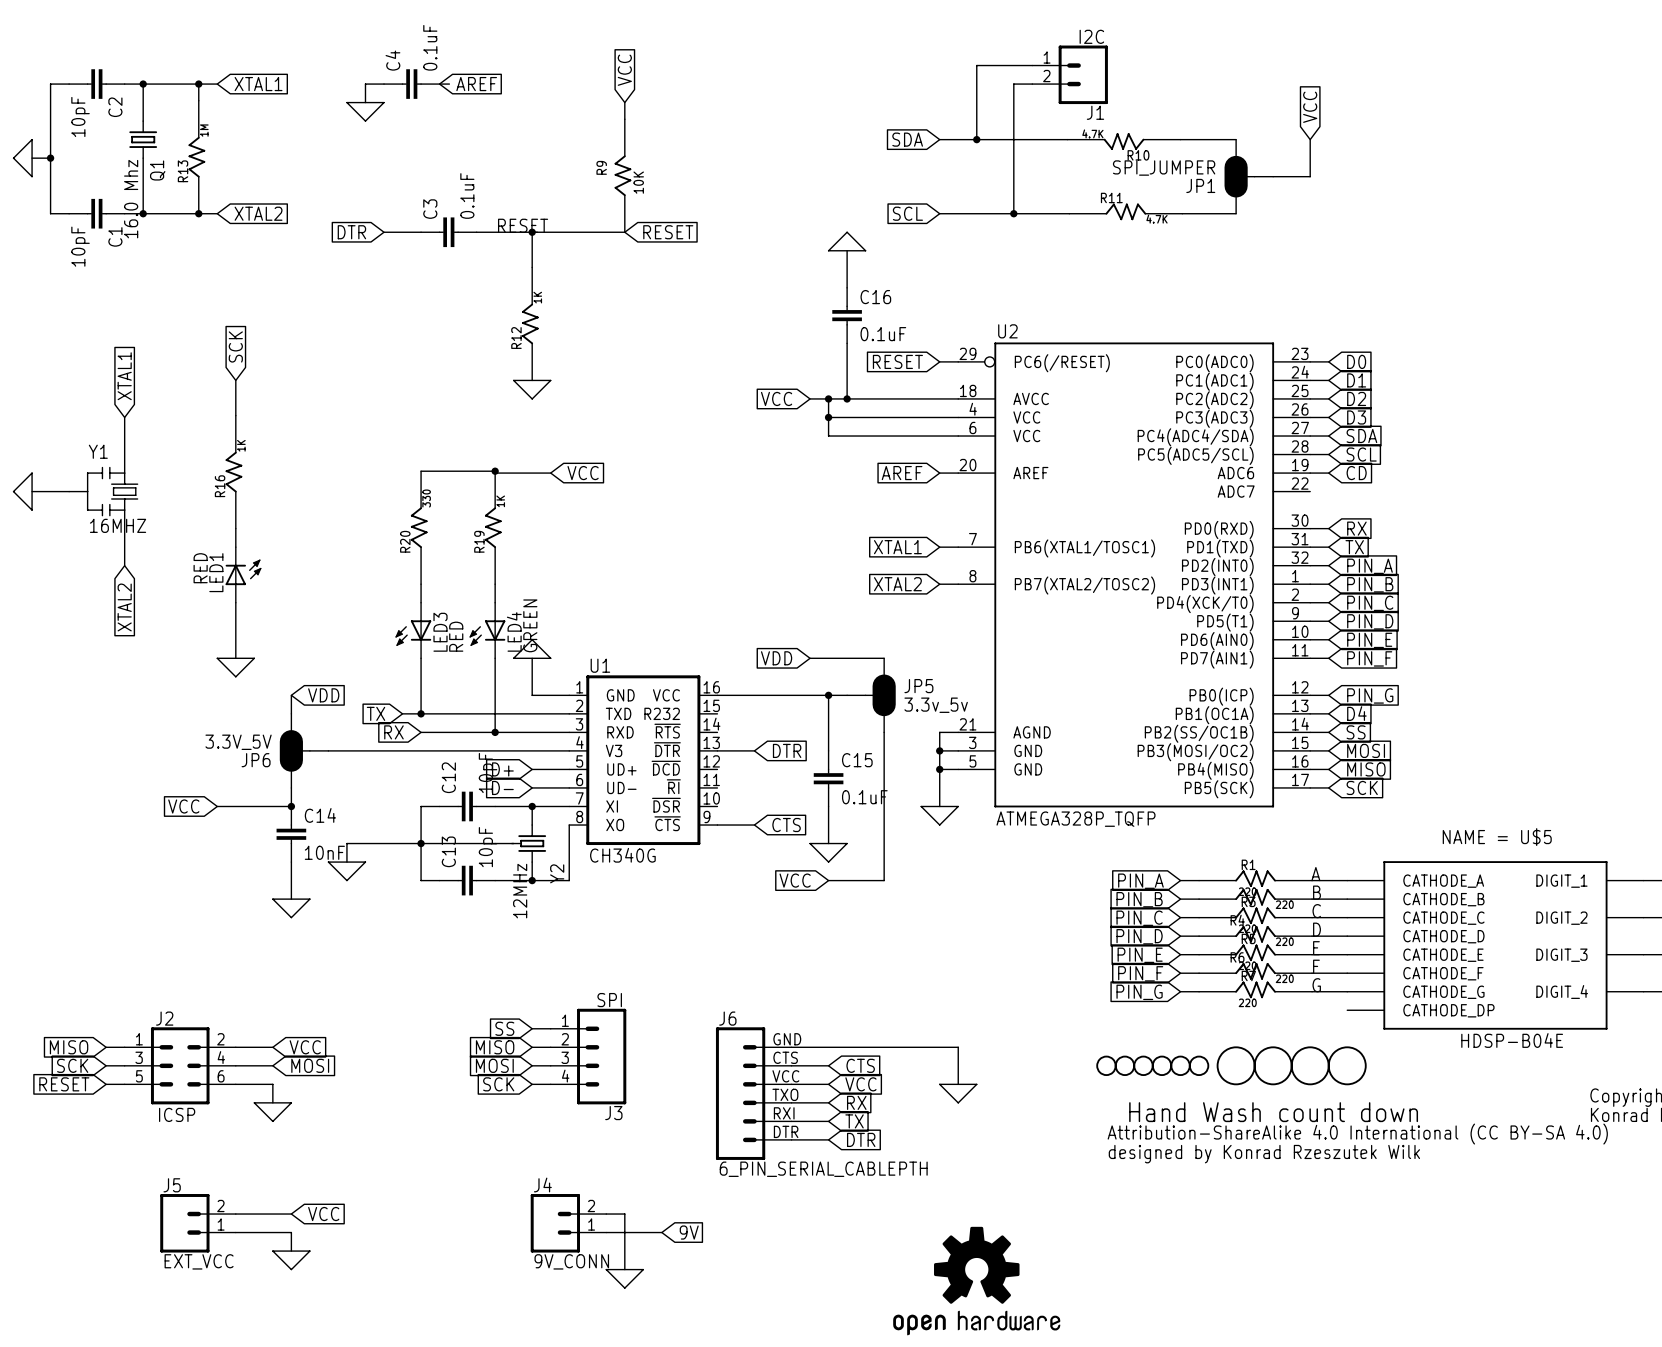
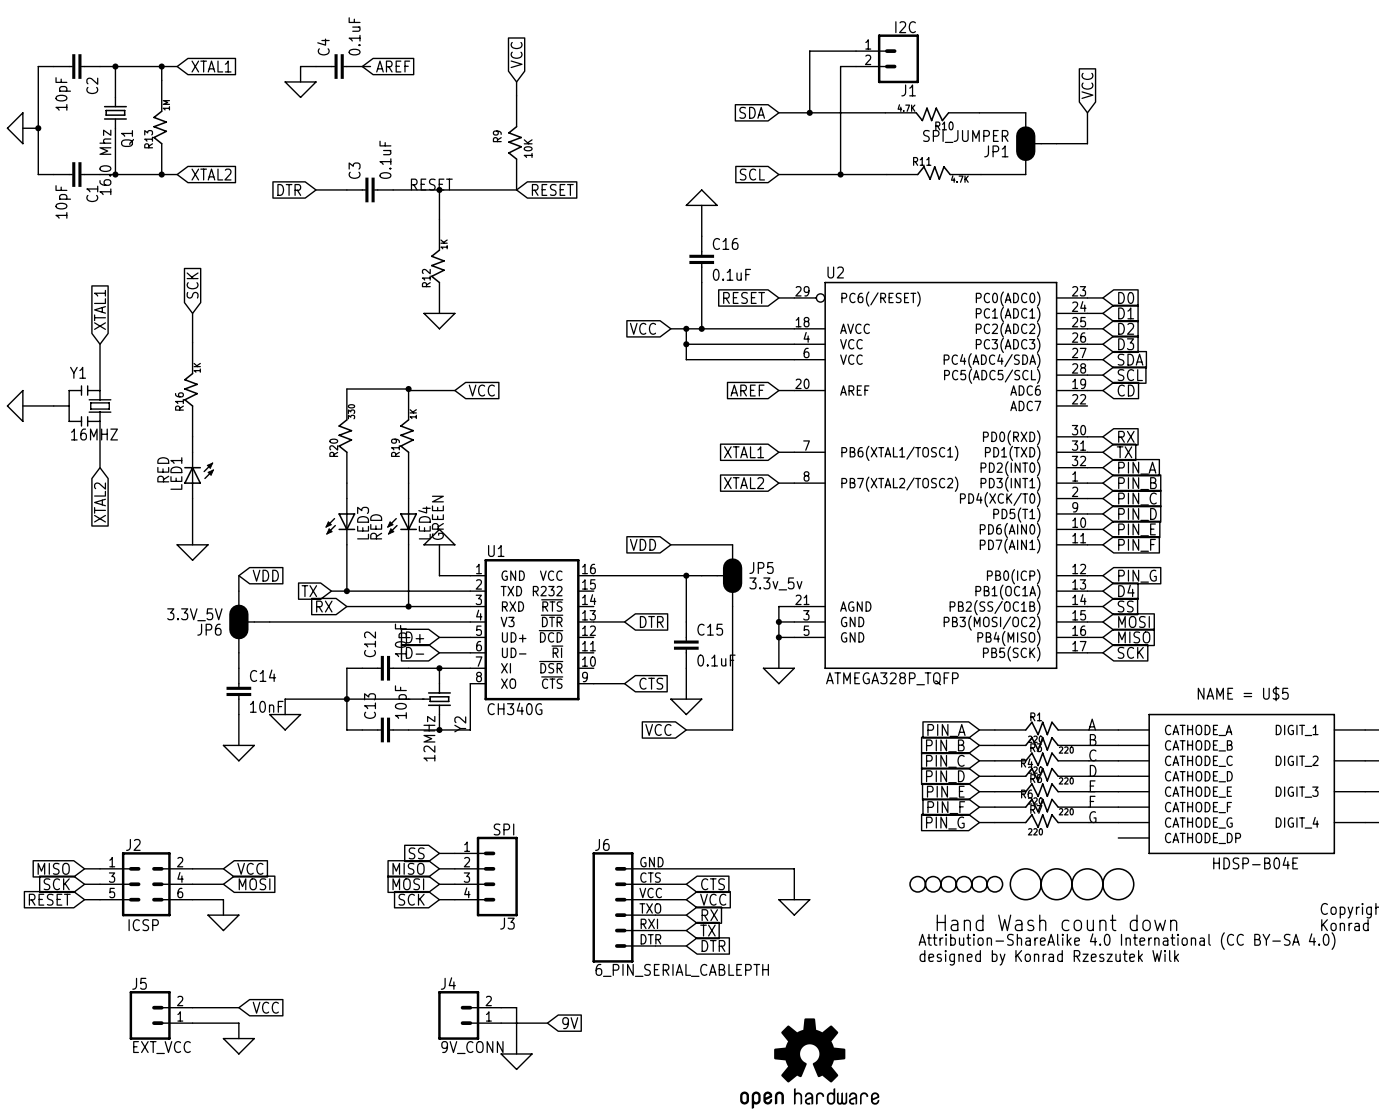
global label: VCC (183, 806) -> none
wire: (217, 806) (291, 806) -> none
junction: (291, 806) -> none

